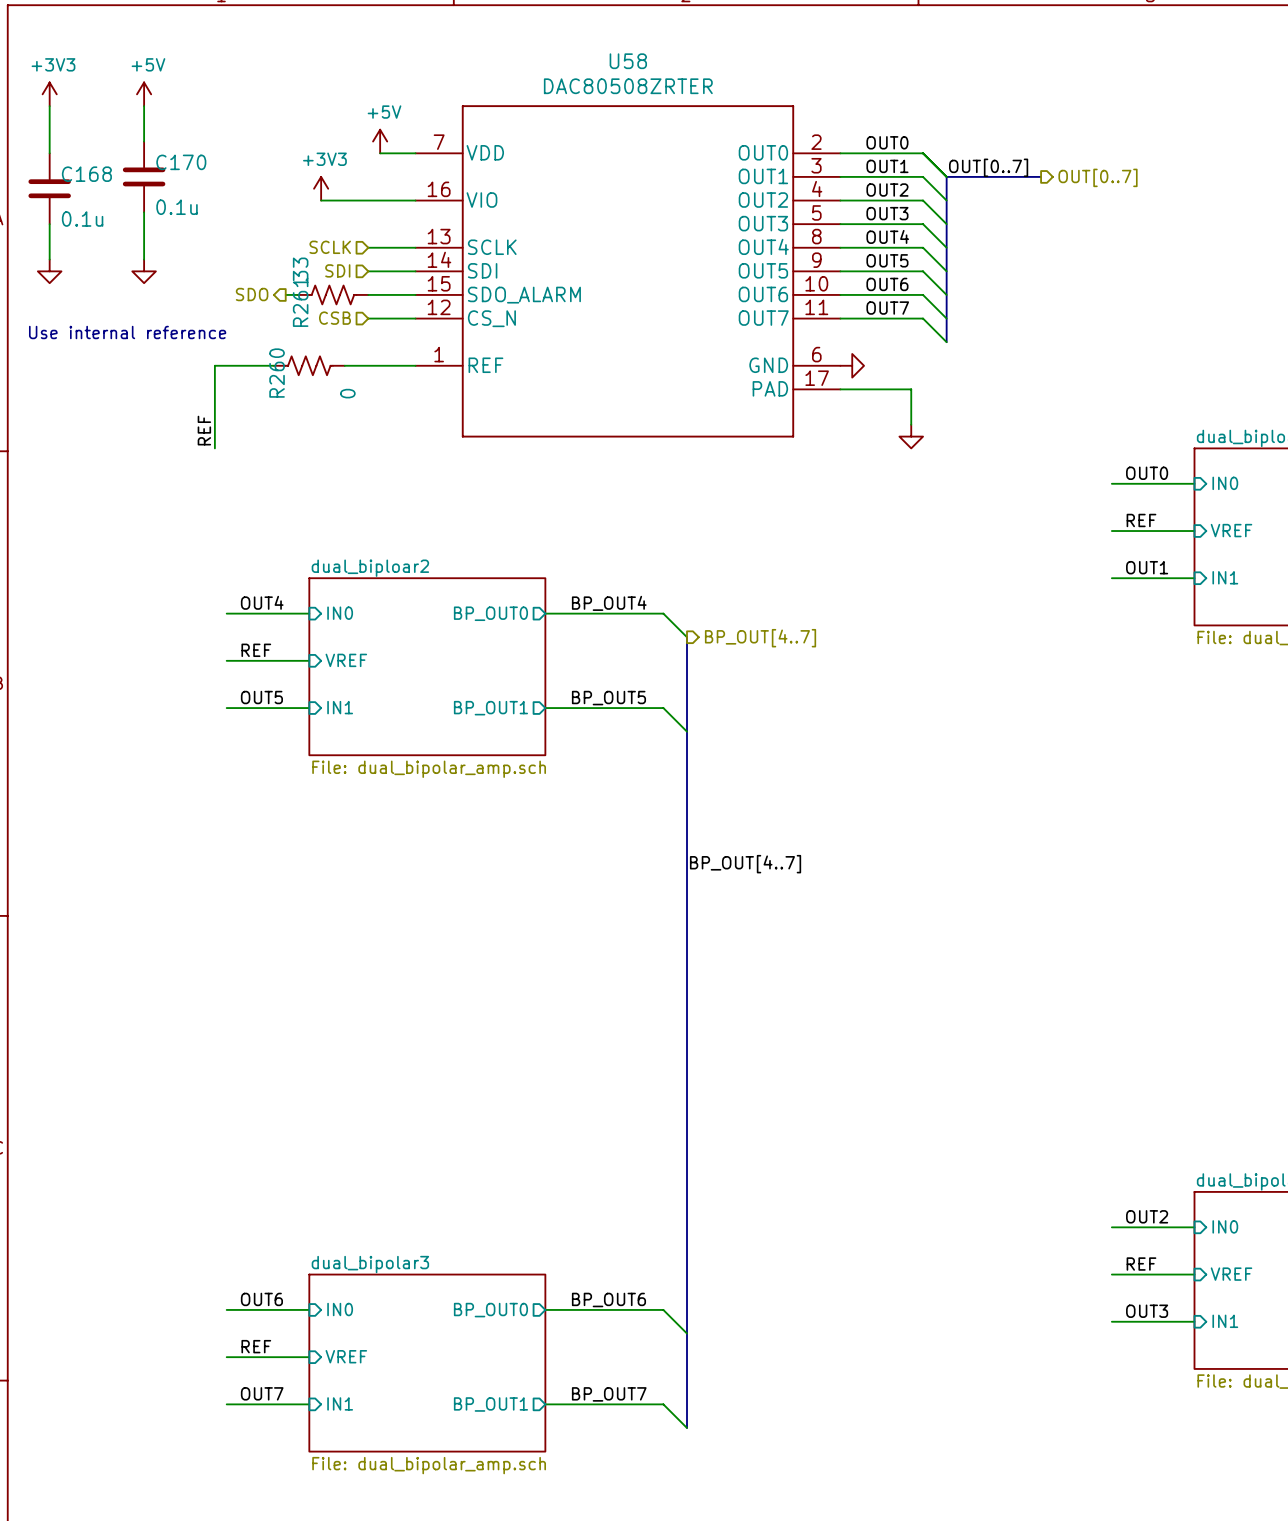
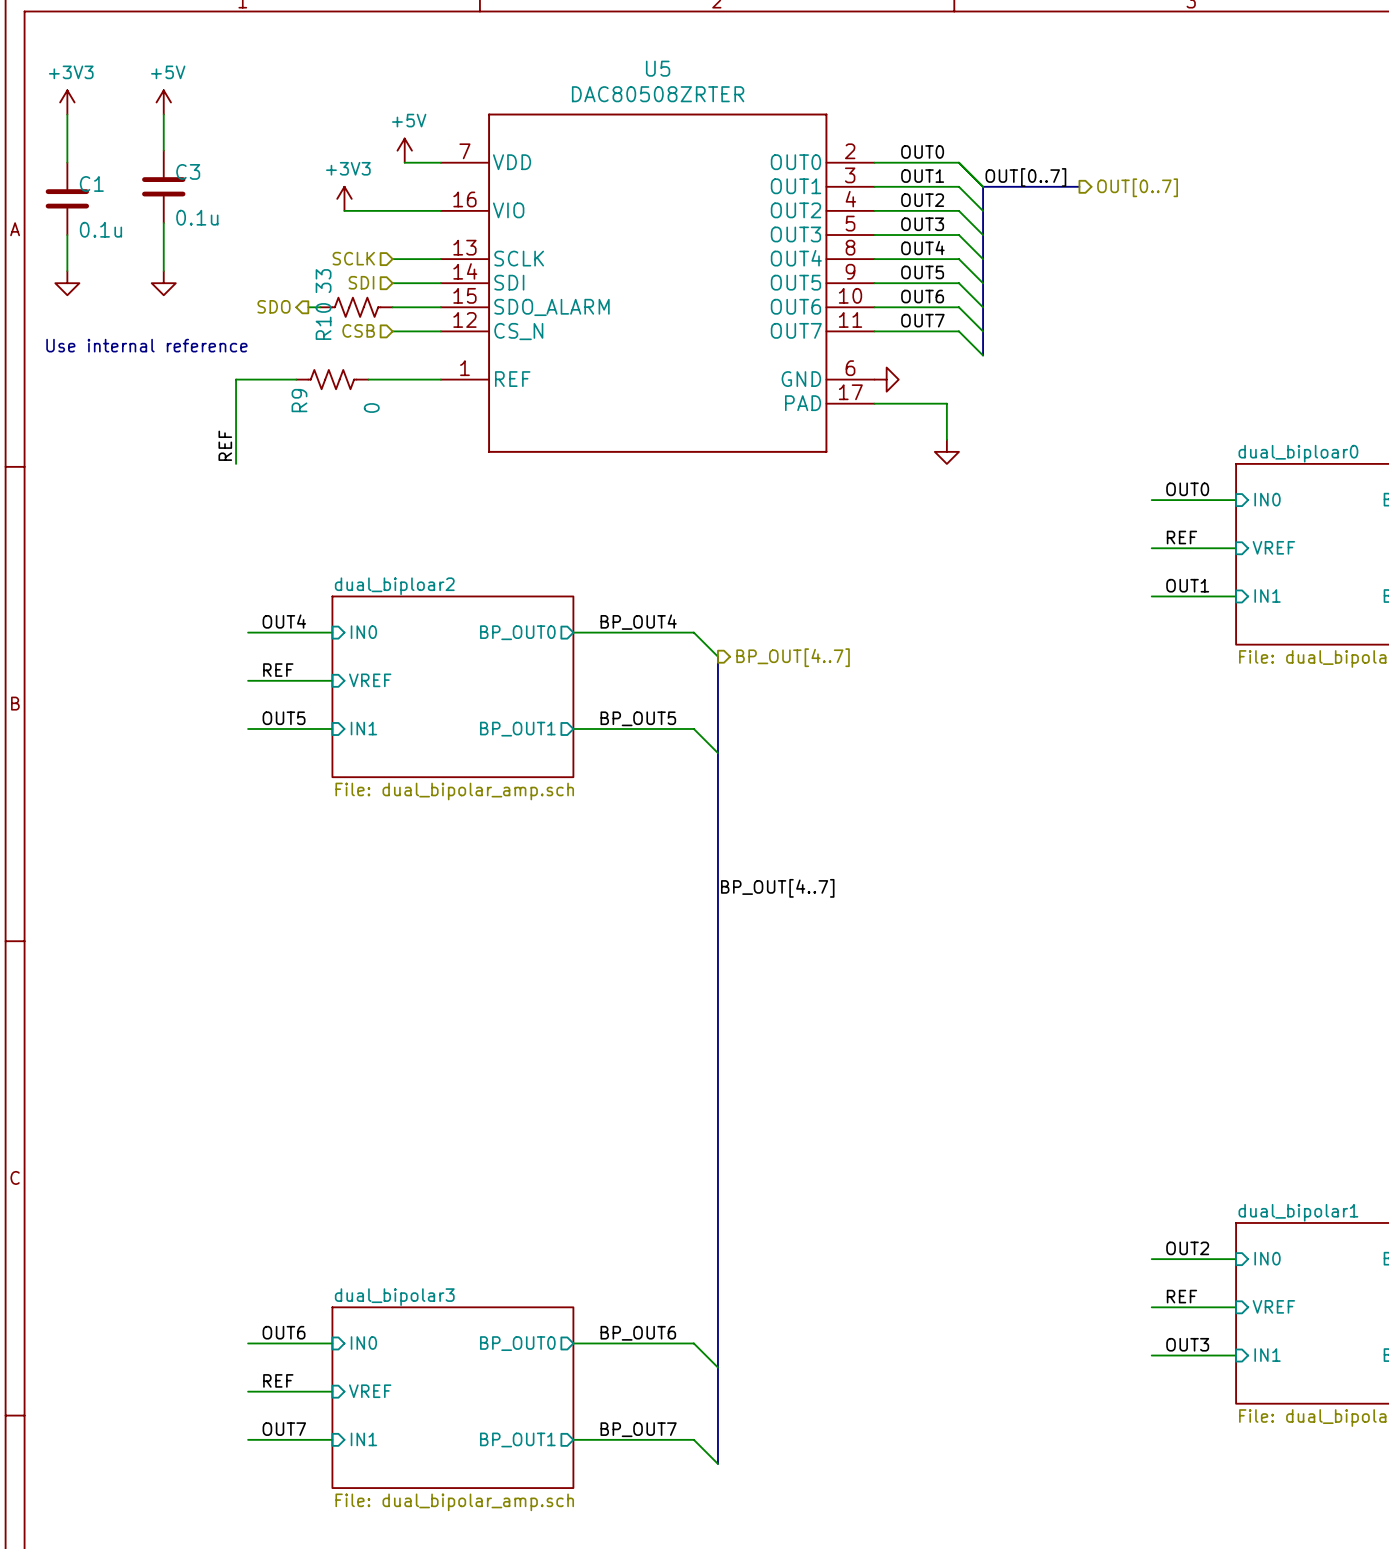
U58 name: U58 (628, 61) -> U5 (658, 68)
C170 name: C170 (181, 162) -> C3 (188, 171)
C168 name: C168 (86, 174) -> C1 (91, 183)
R261 name: R261 (300, 302) -> R10 (323, 321)
R260 name: R260 (277, 373) -> R9 (299, 400)

